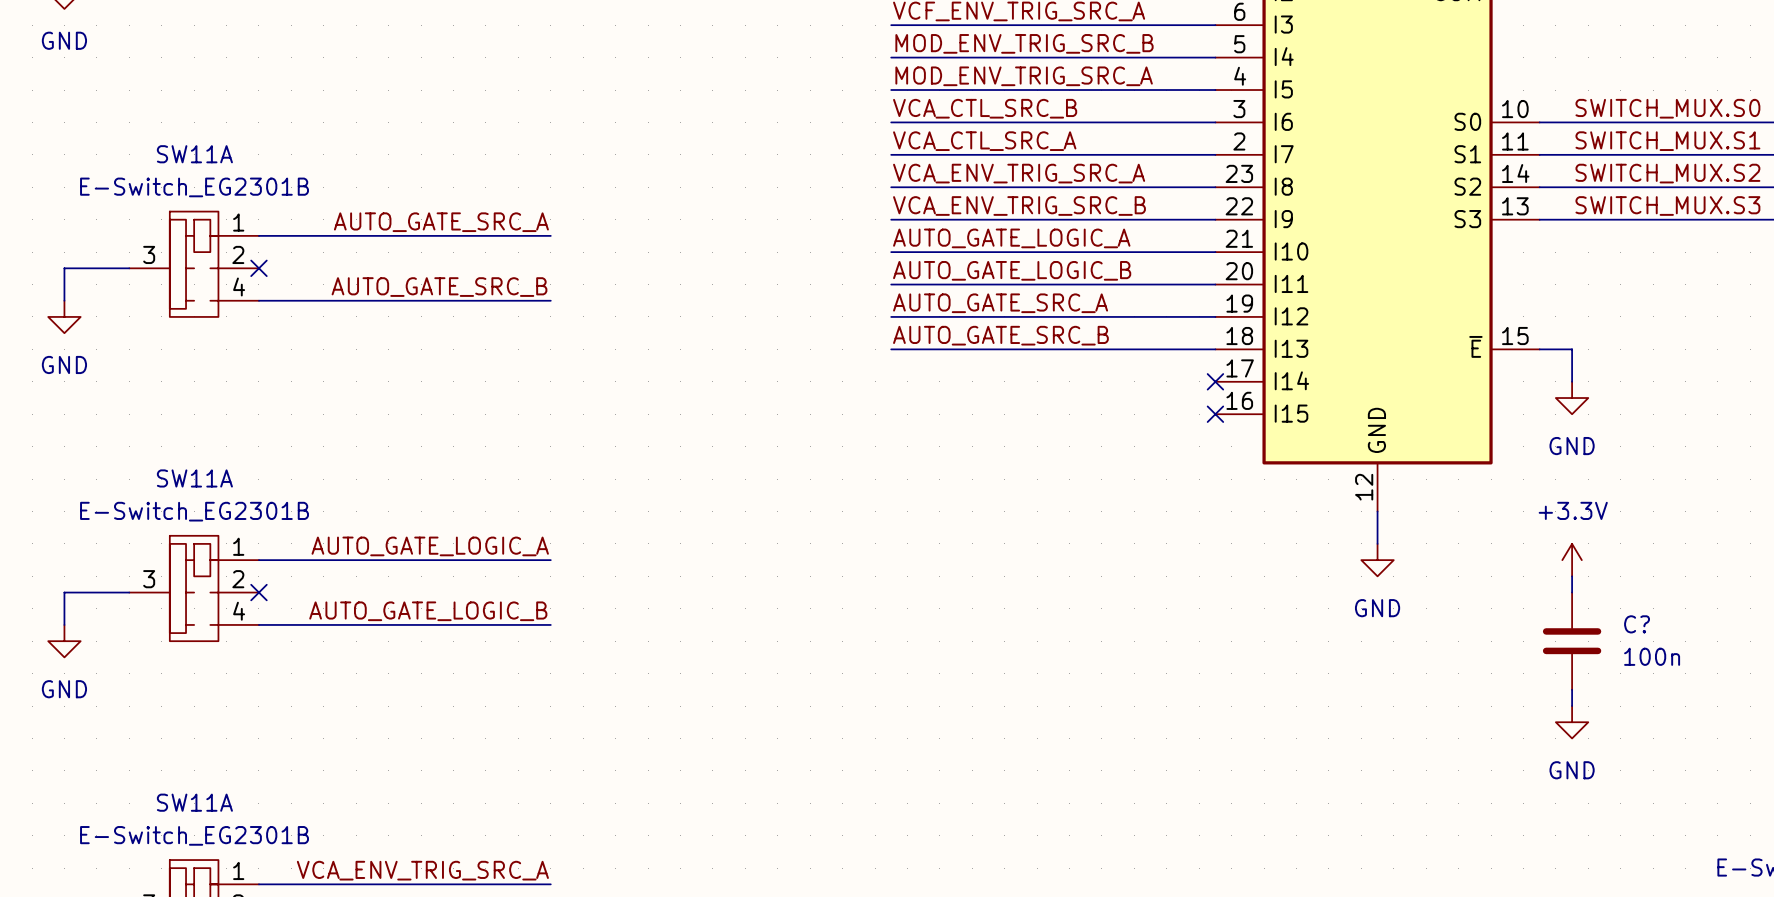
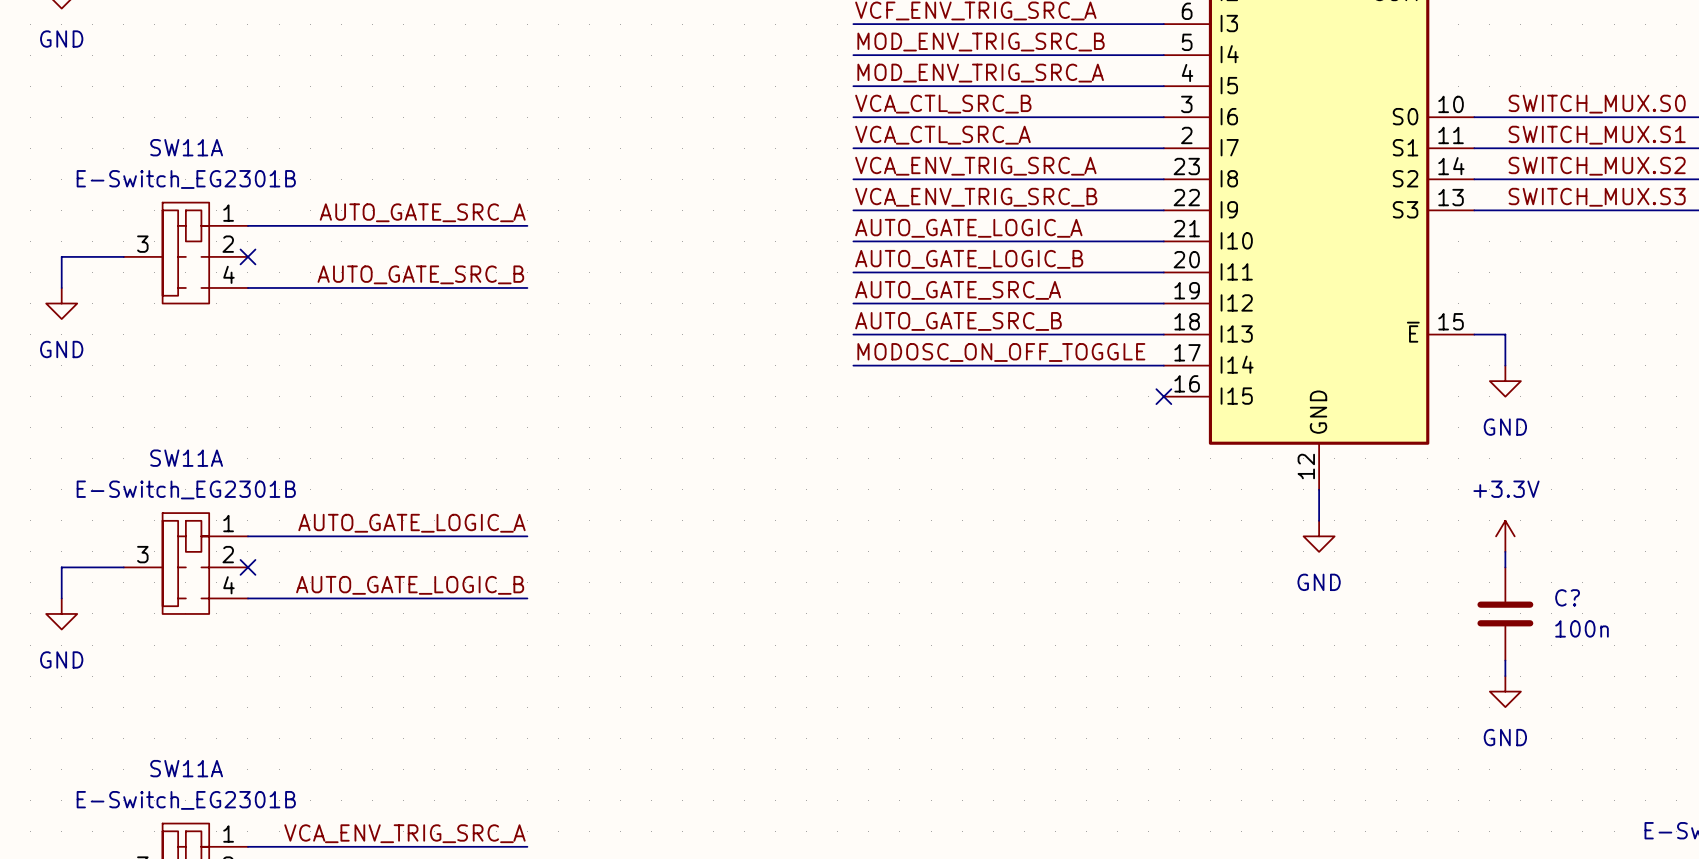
label: none -> MODOSC_ON_OFF_TOGGLE (1001, 352)
wire: none -> (853, 365) (1163, 365)
no-connect mark: (1215, 381) -> none

